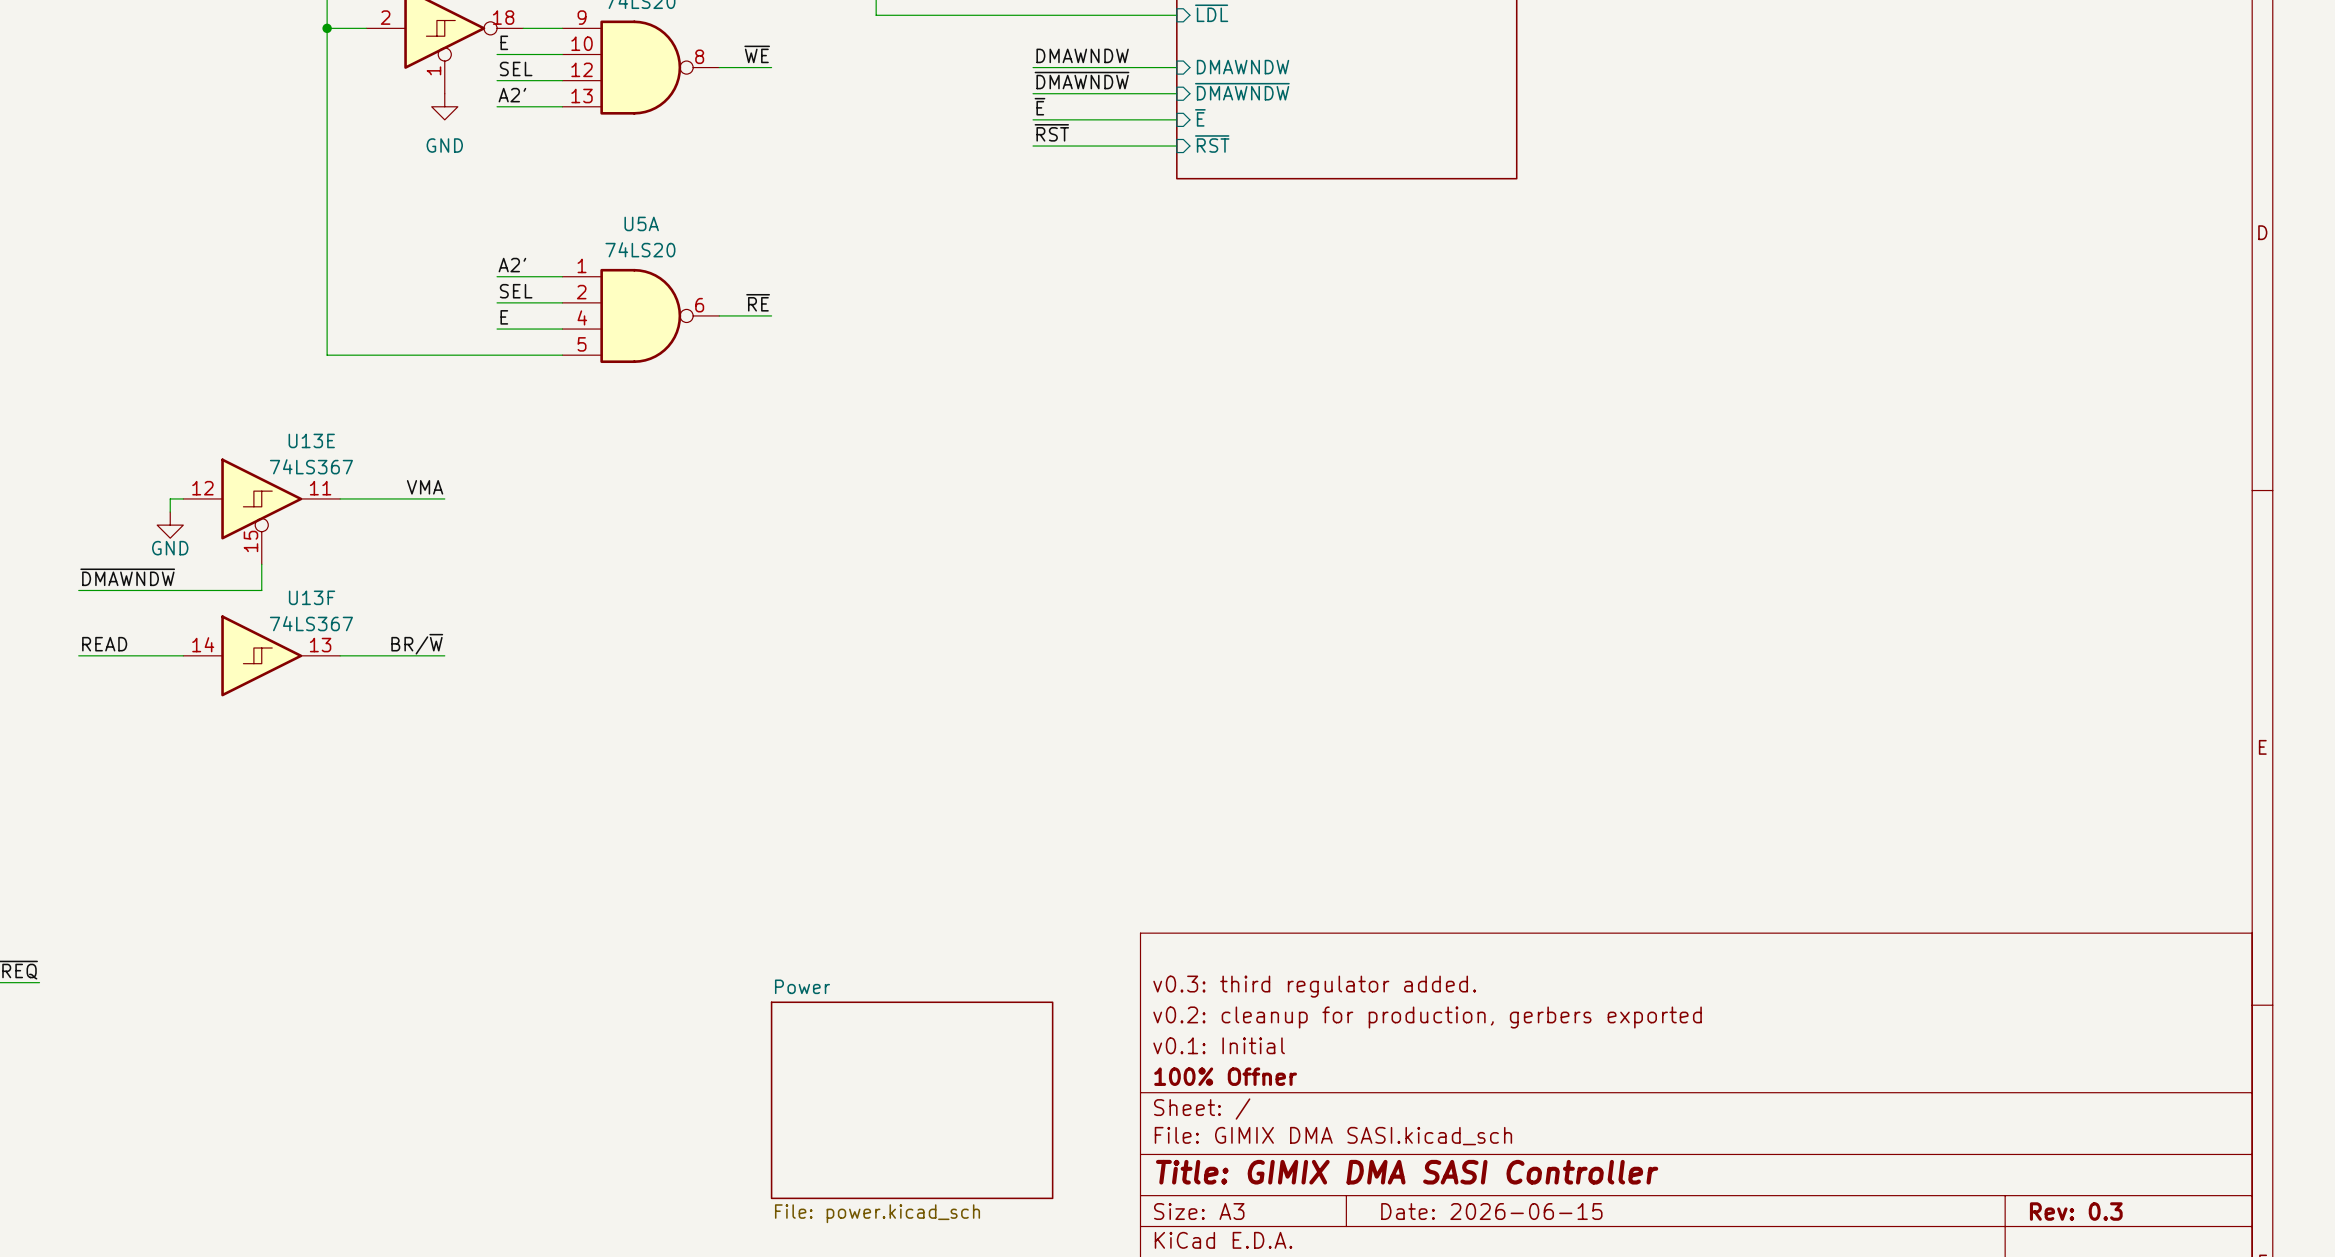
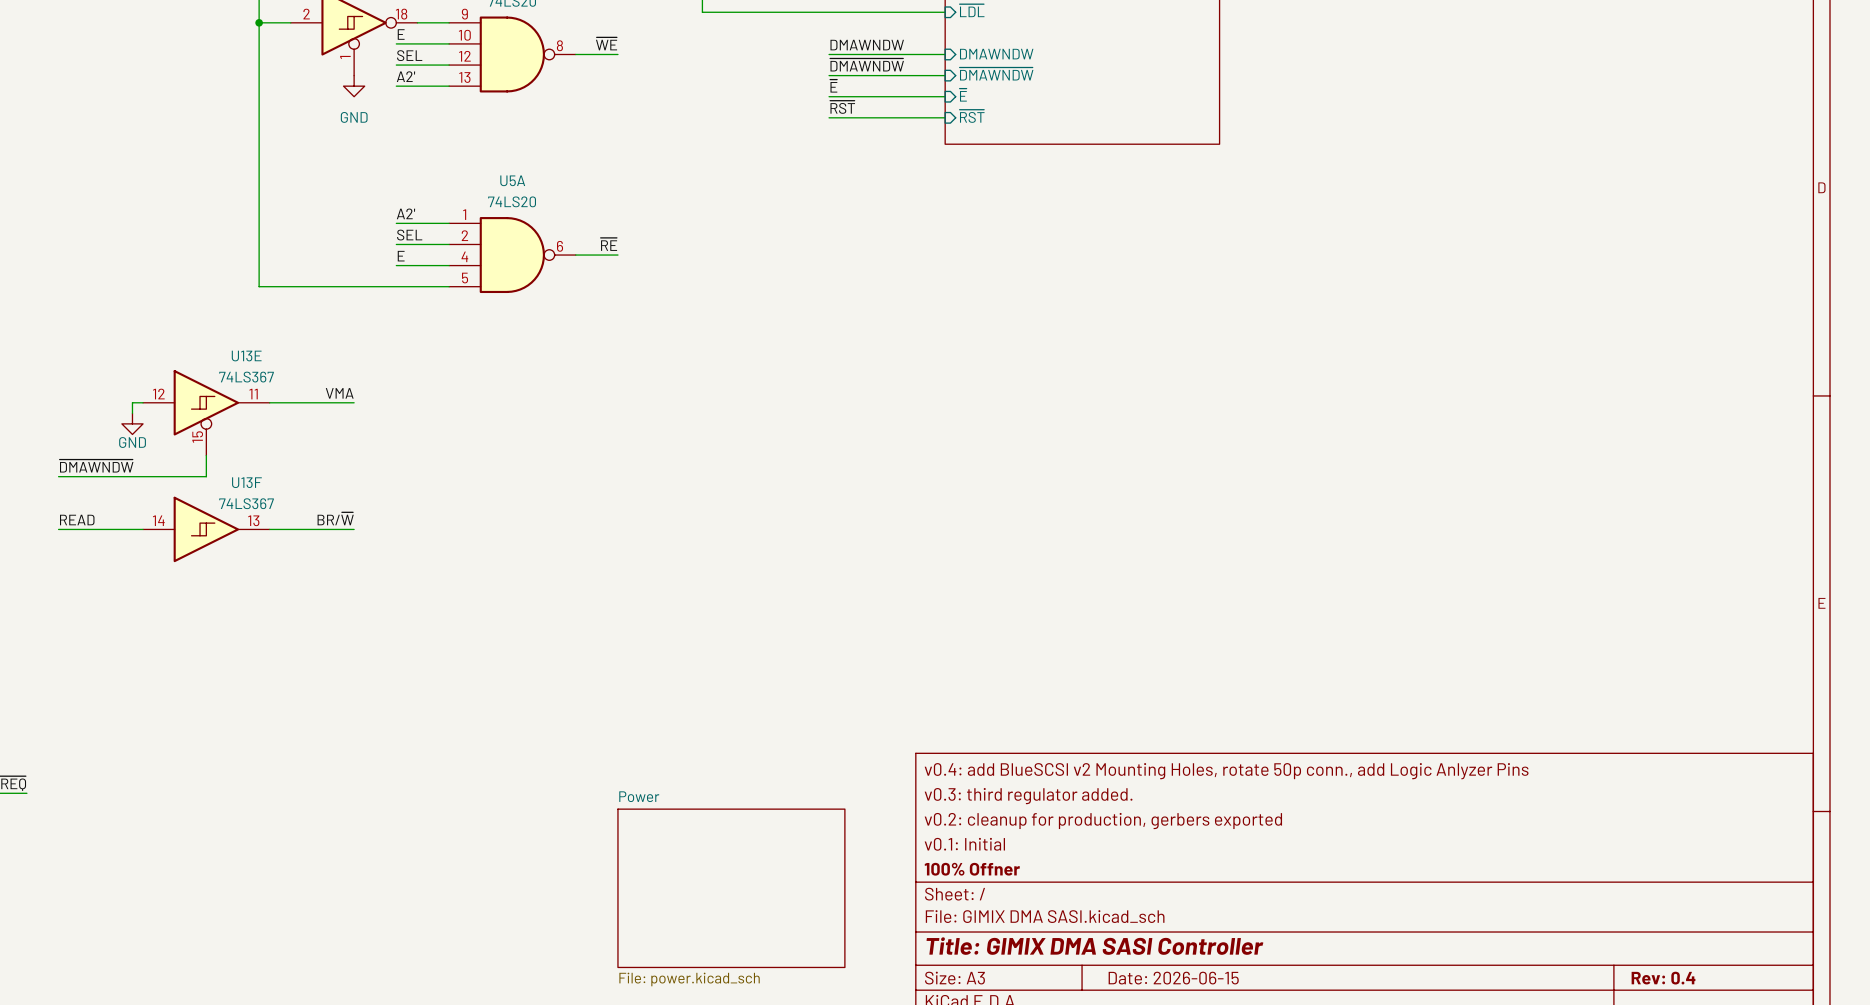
title block: none -> v0.4: add BlueSCSI v2 Mounting Holes, rotate 50p conn., add Logic Anlyzer Pins (1226, 771)
title block: Rev: 0.3 (2076, 1211) -> Rev: 0.4 (1663, 978)

